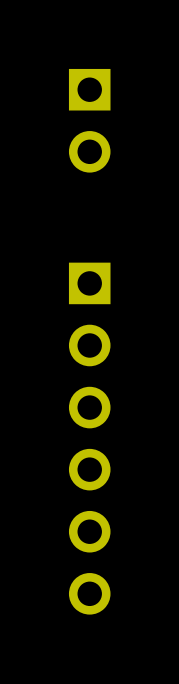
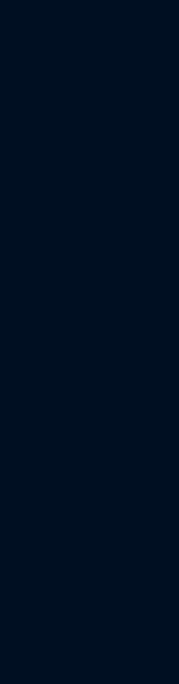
part: (89, 120) -> none
part: (89, 438) -> none

